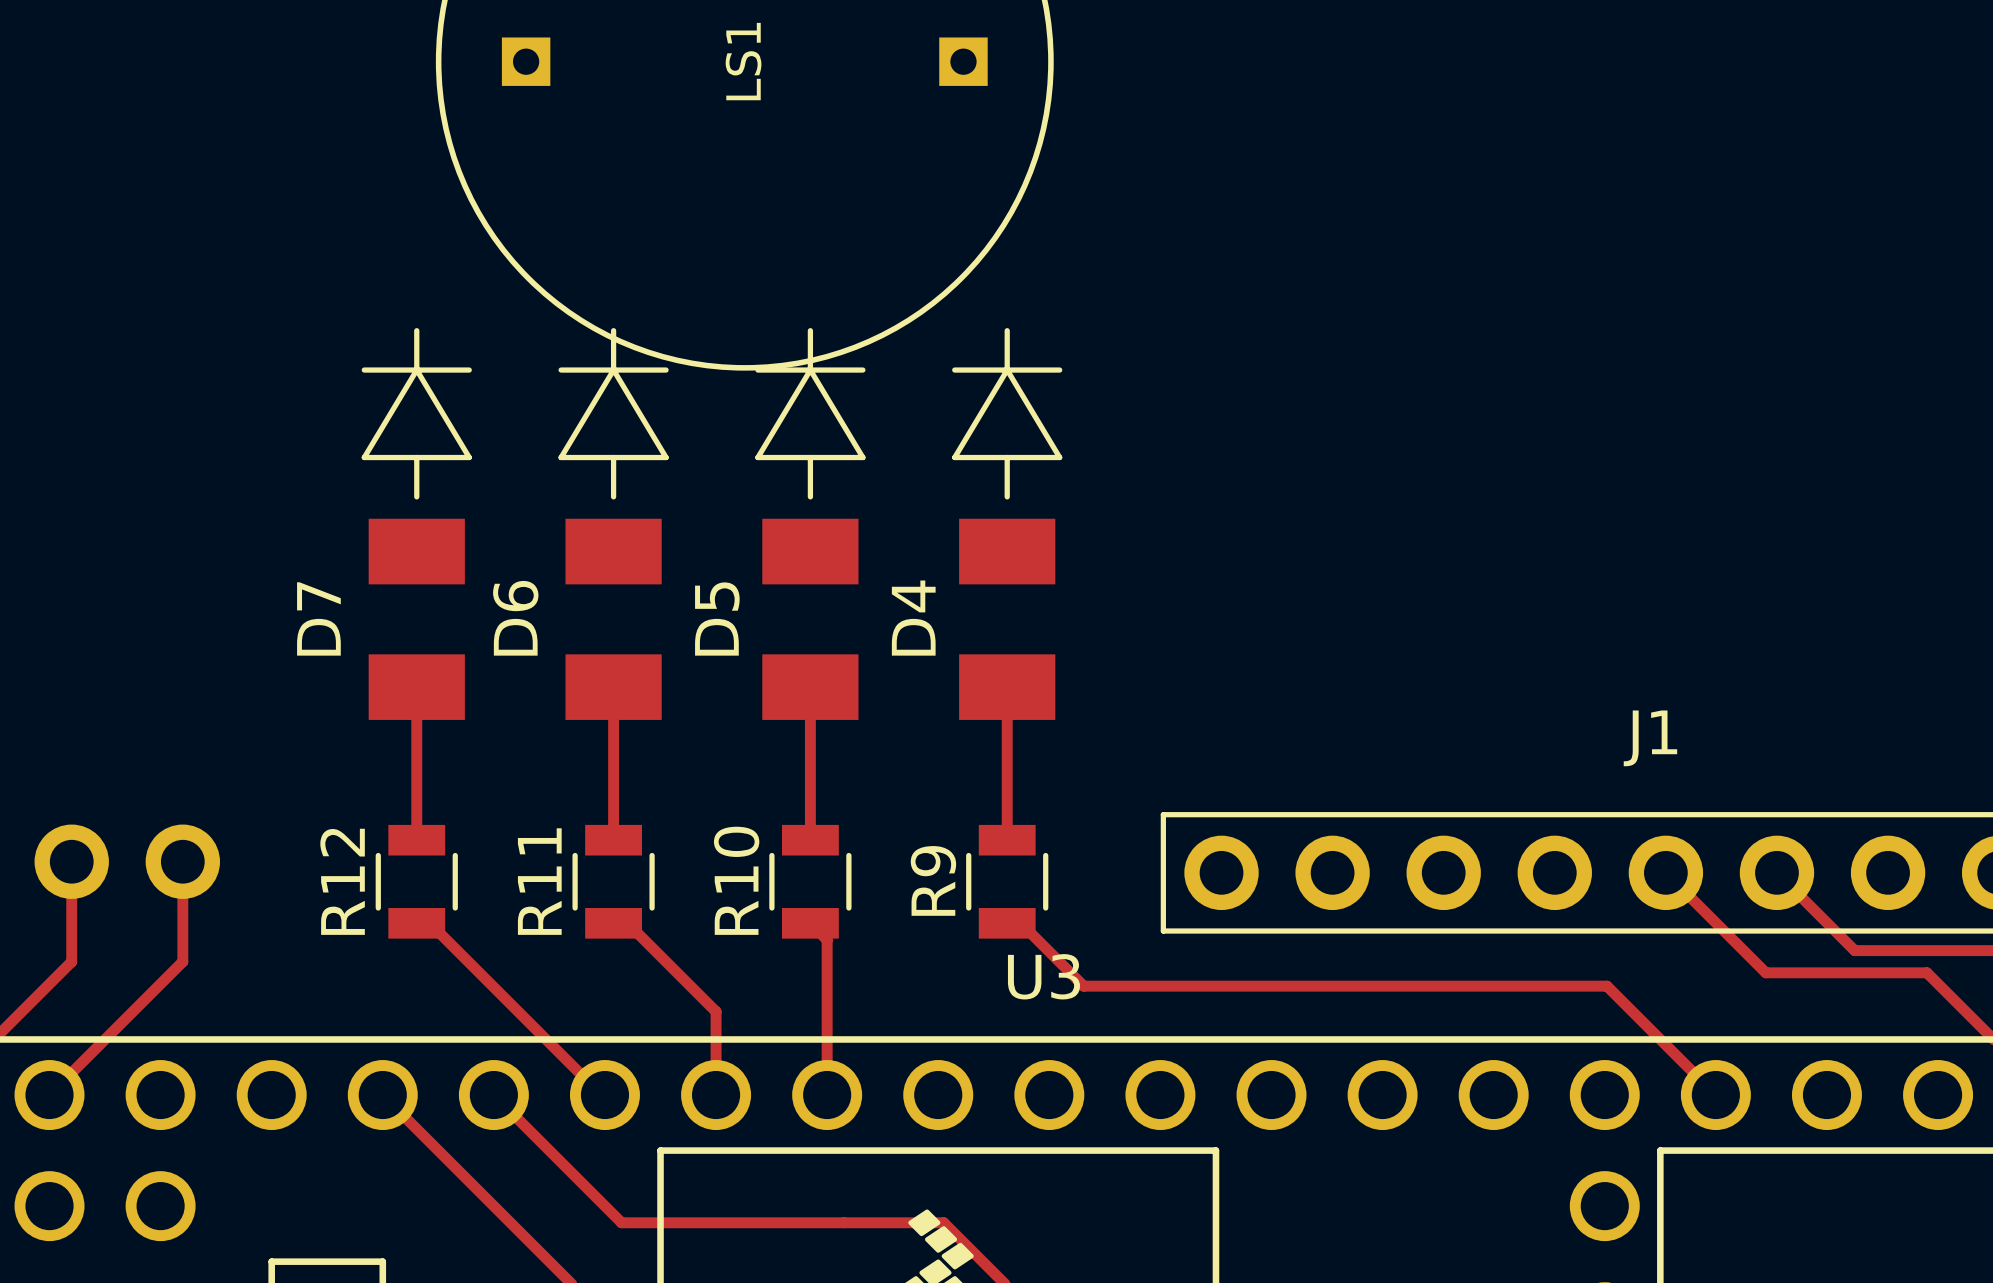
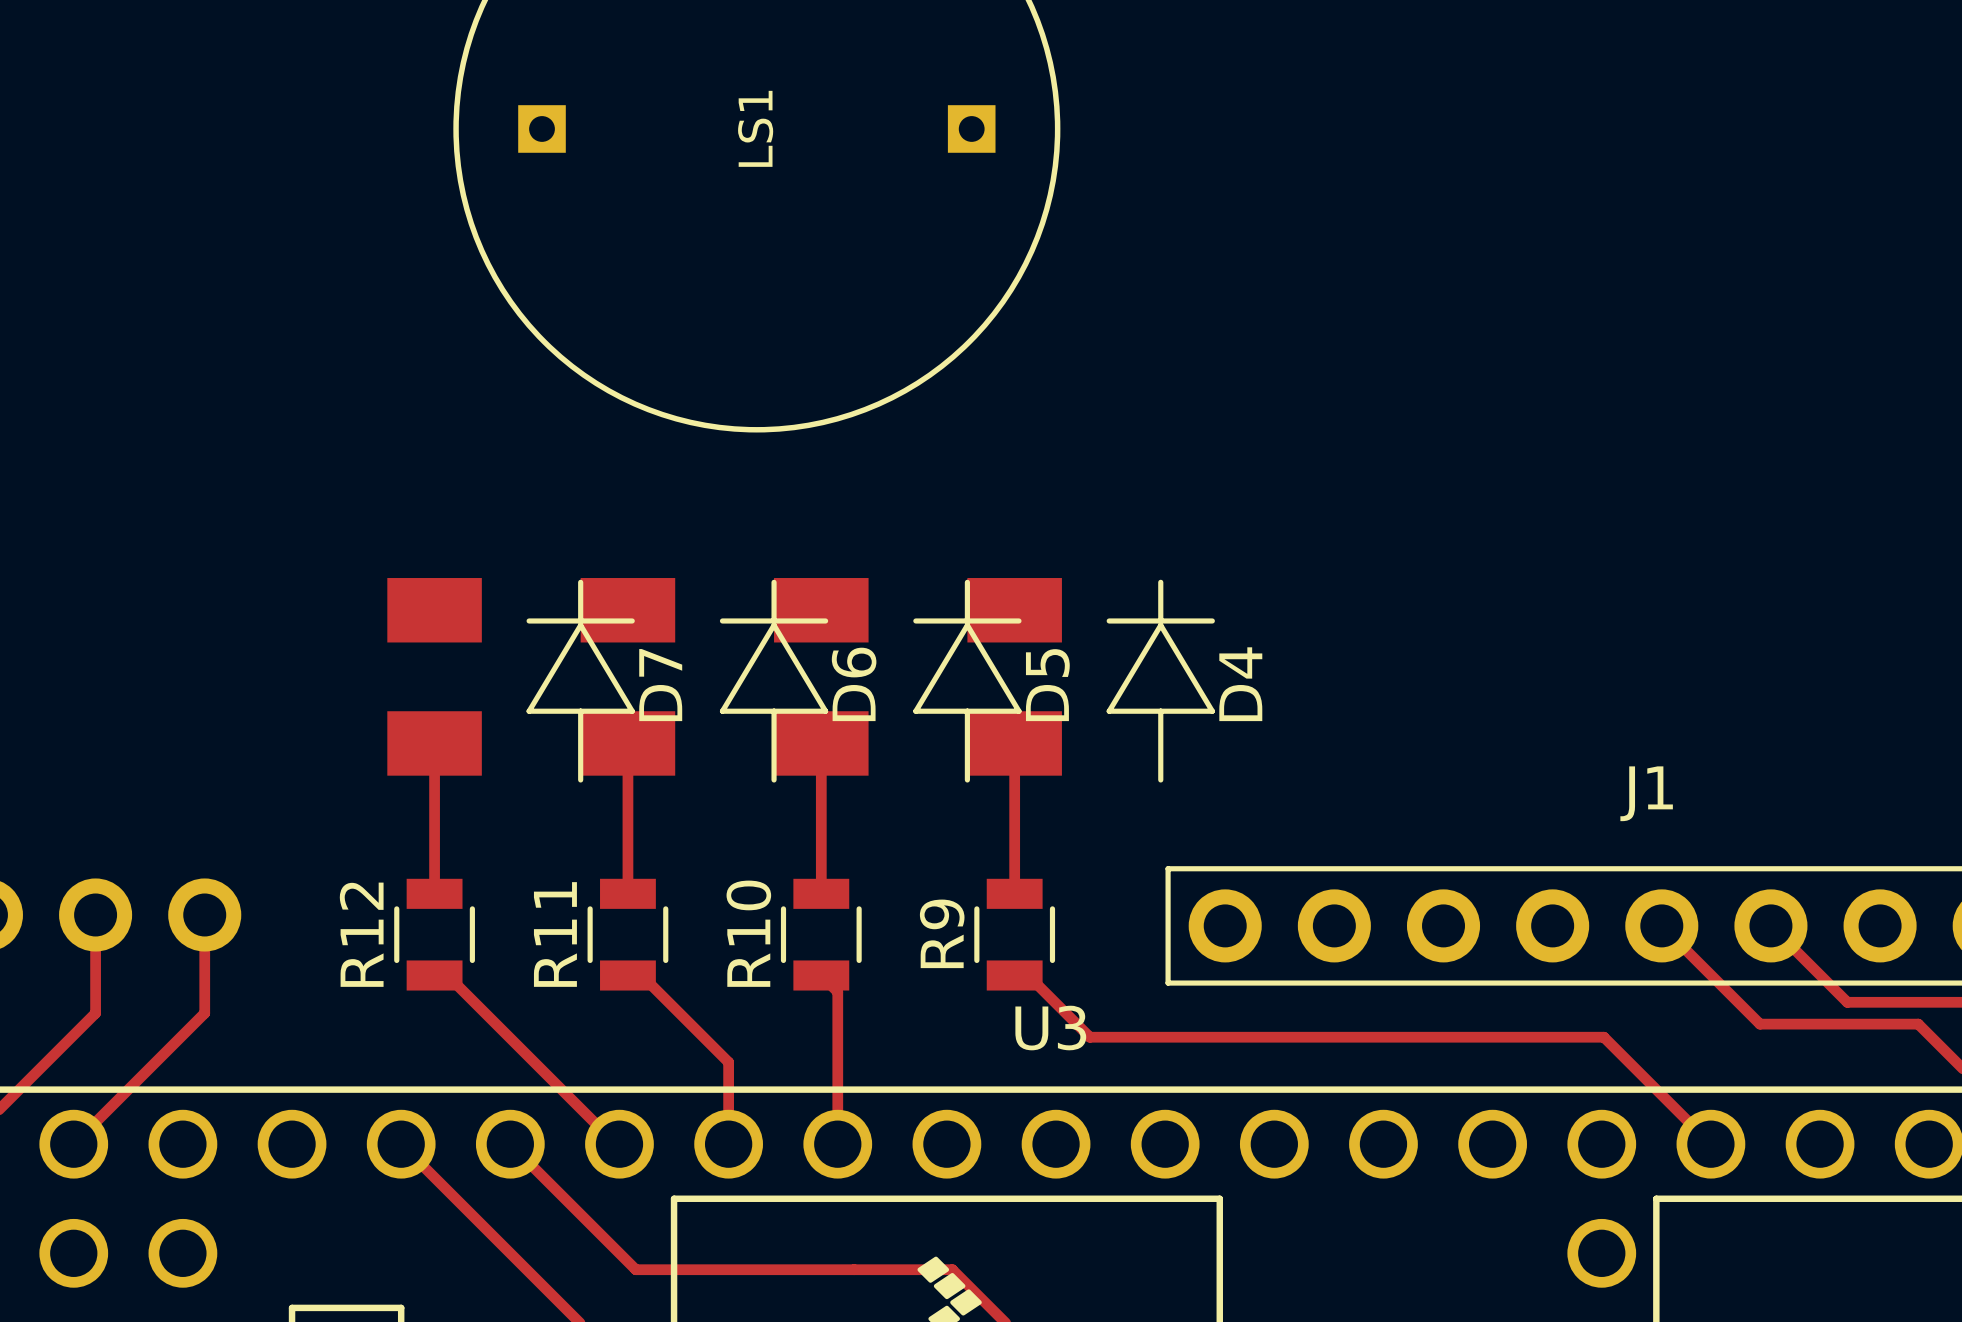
D7 footprint: [361, 328, 472, 720] -> [387, 578, 635, 783]
D6 footprint: [558, 328, 669, 720] -> [580, 578, 829, 783]
D5 footprint: [755, 328, 866, 720] -> [774, 578, 1022, 783]
D4 footprint: [952, 328, 1063, 720] -> [967, 578, 1215, 783]
D7 name position: D7 (318, 618) -> D7 (660, 685)
D6 name position: D6 (515, 618) -> D6 (854, 684)
D4 name position: D4 (913, 618) -> D4 (1240, 684)
D5 name position: D5 (717, 619) -> D5 (1047, 685)

